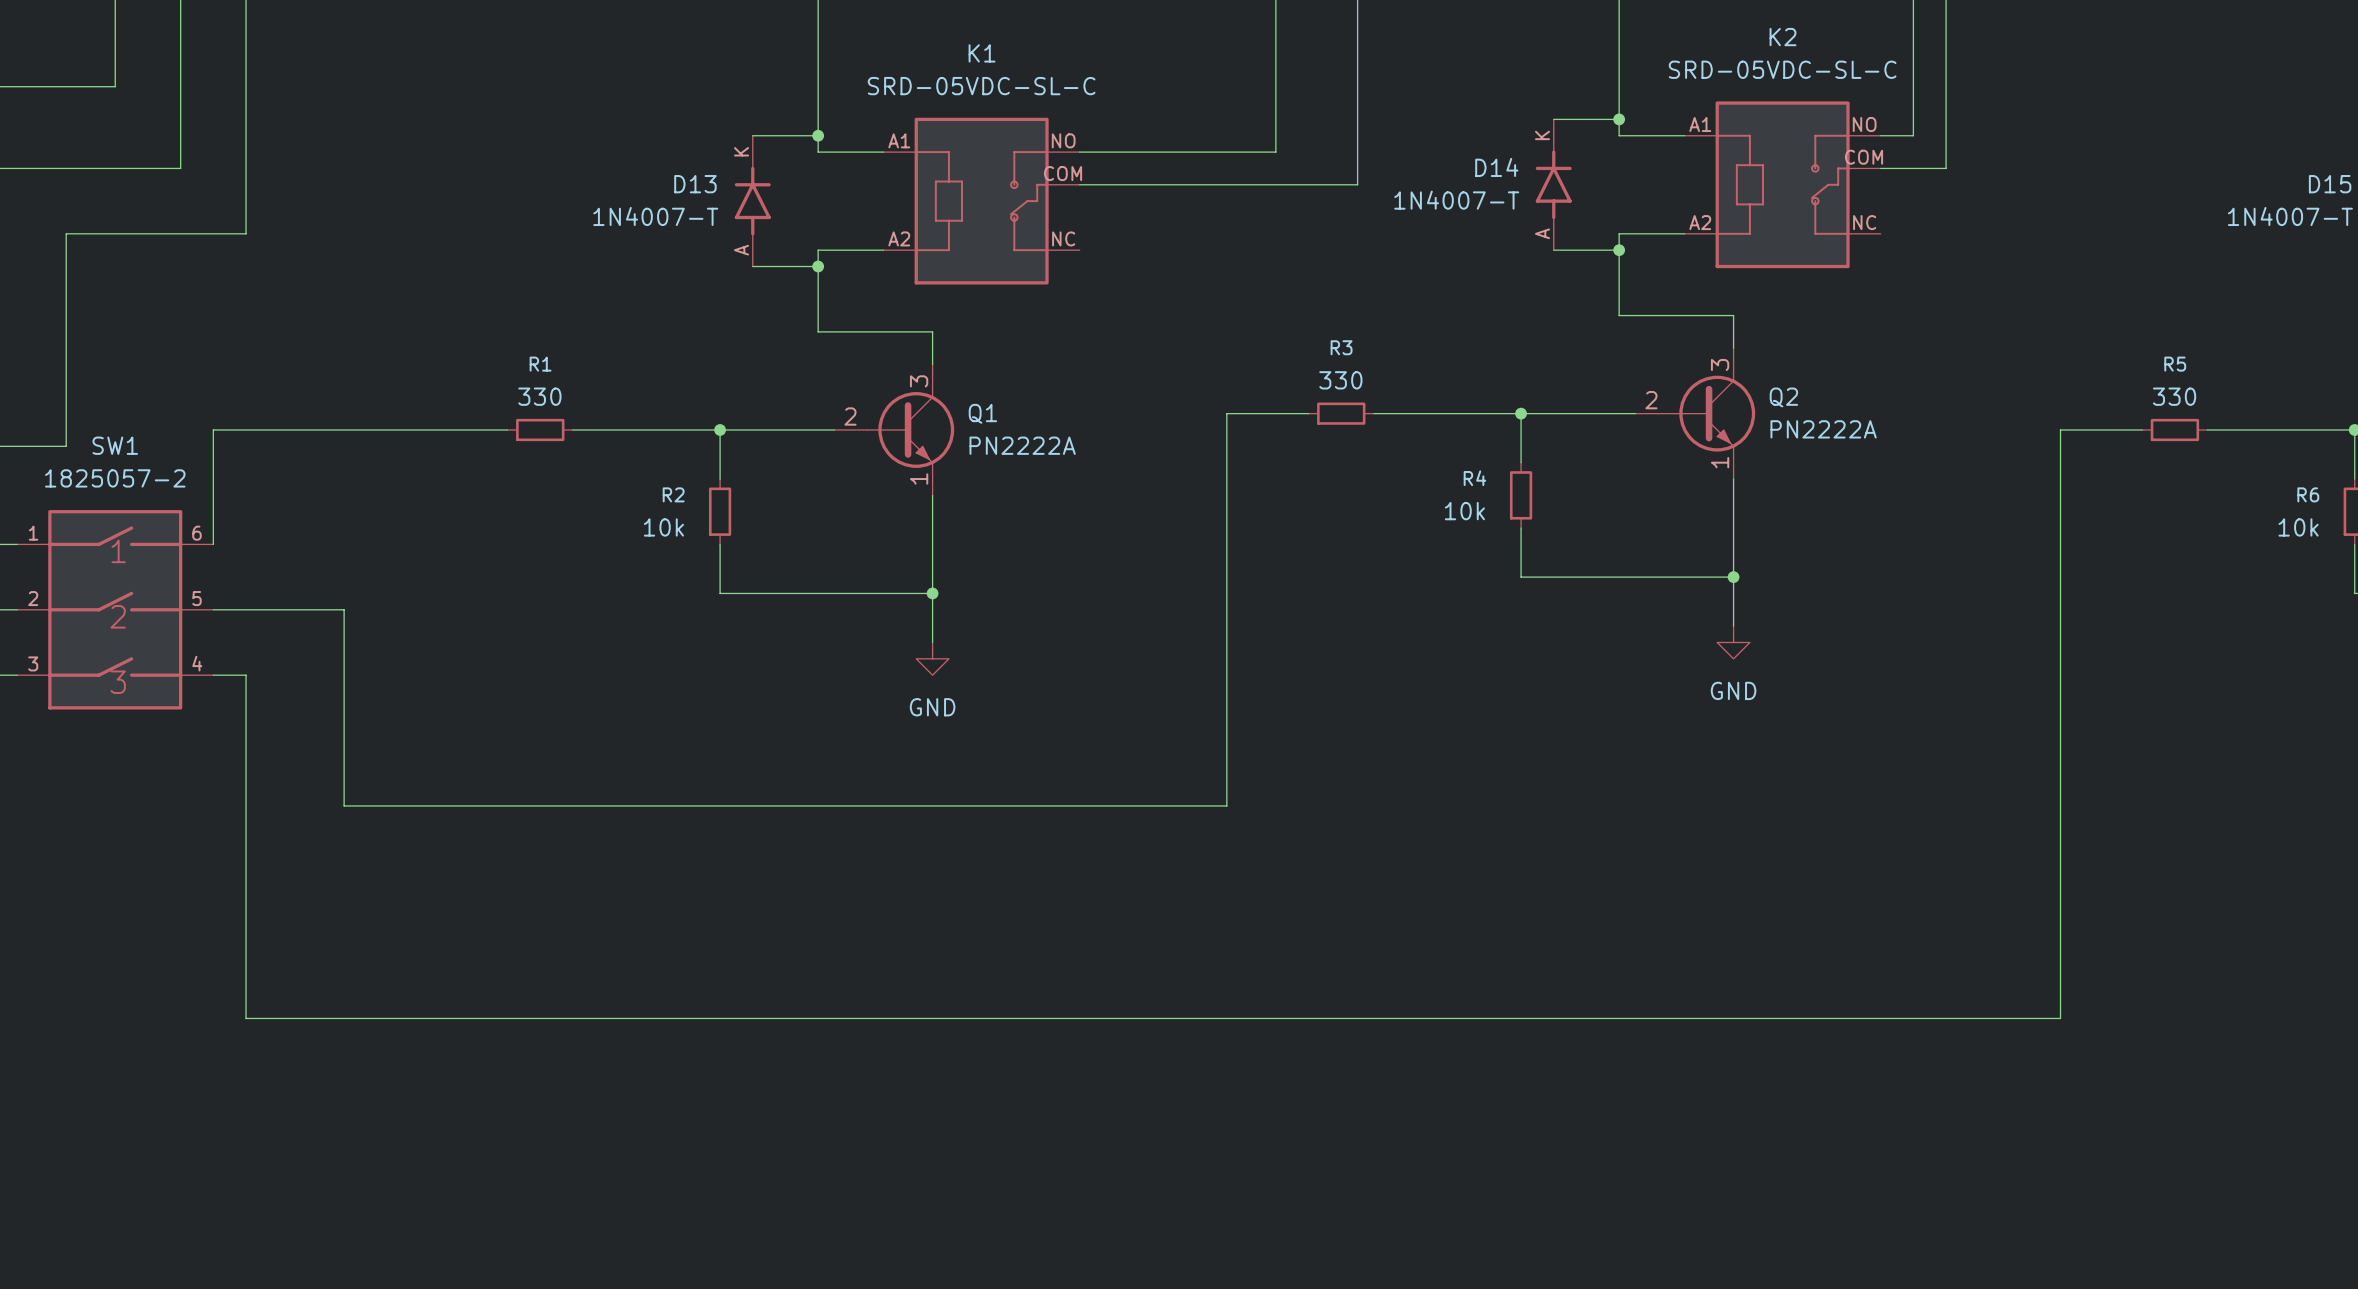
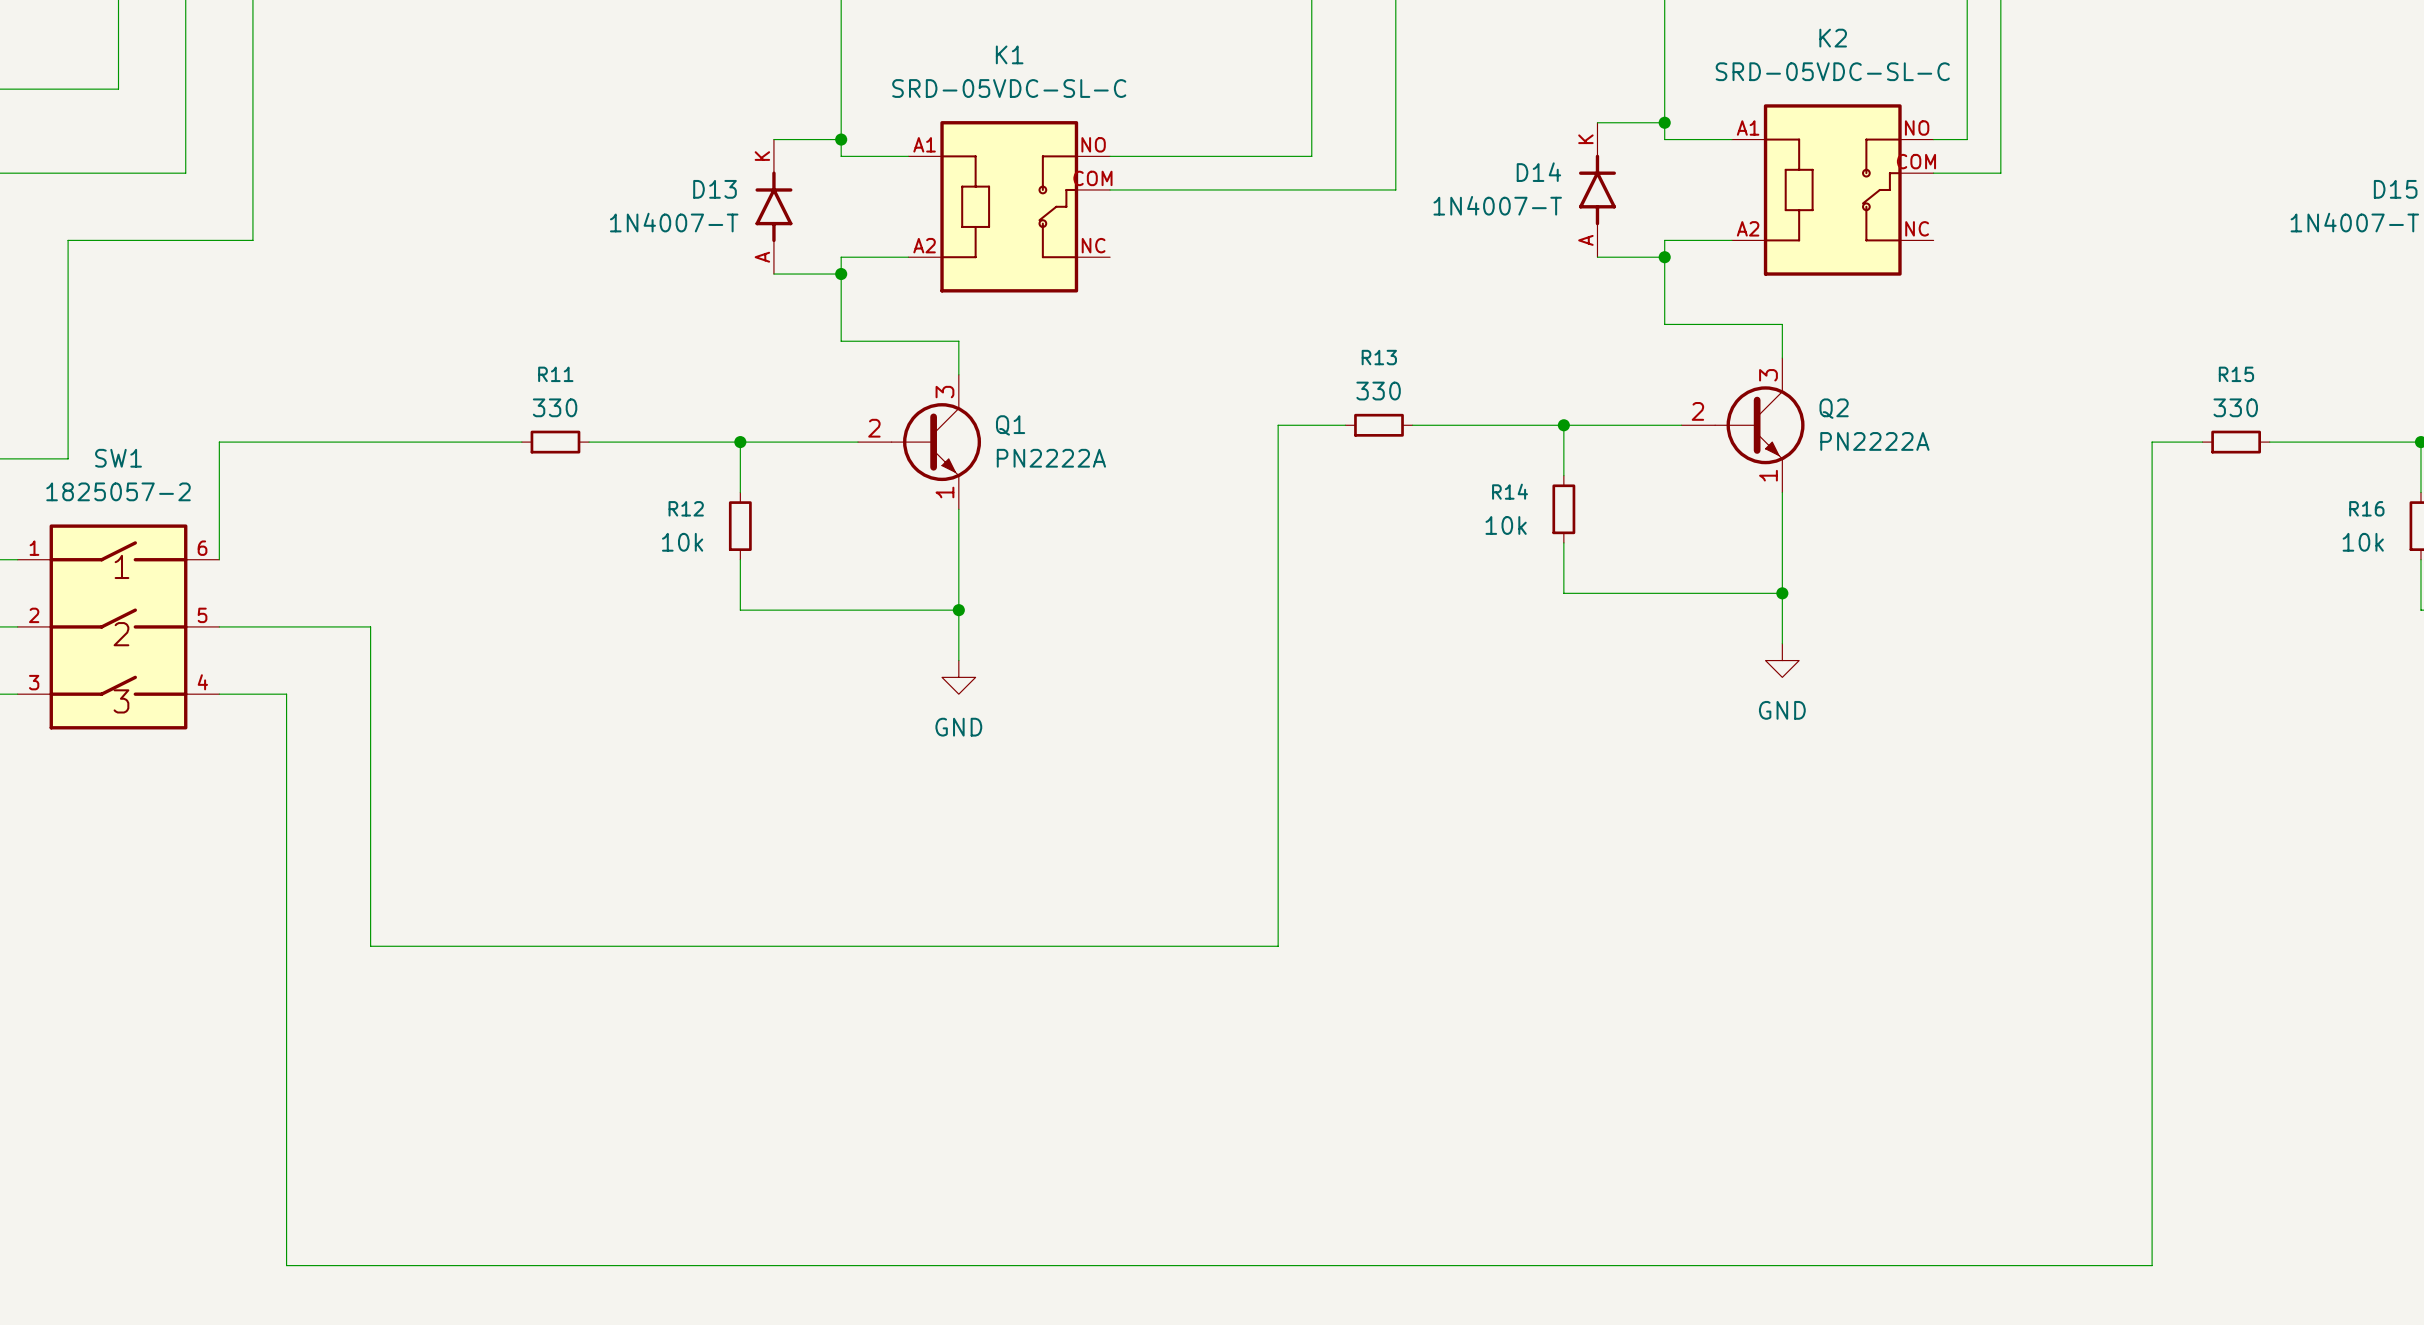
R3 name: R3 (1341, 347) -> R13 (1379, 357)
R1 name: R1 (540, 364) -> R11 (555, 374)
R5 name: R5 (2175, 364) -> R15 (2236, 374)
wire: (1243, 413) (1226, 413) (1226, 805) (344, 805) (344, 609) -> (1278, 425) (1278, 946) (370, 946) (370, 626) (353, 626)
wire: (2093, 429) (2060, 429) (2060, 1018) (246, 1018) (246, 675) -> (2152, 442) (2152, 1265) (286, 1265) (286, 694) (252, 694)
R4 name: R4 (1474, 478) -> R14 (1510, 491)
R2 name: R2 (673, 494) -> R12 (686, 508)
R6 name: R6 (2308, 494) -> R16 (2366, 508)

